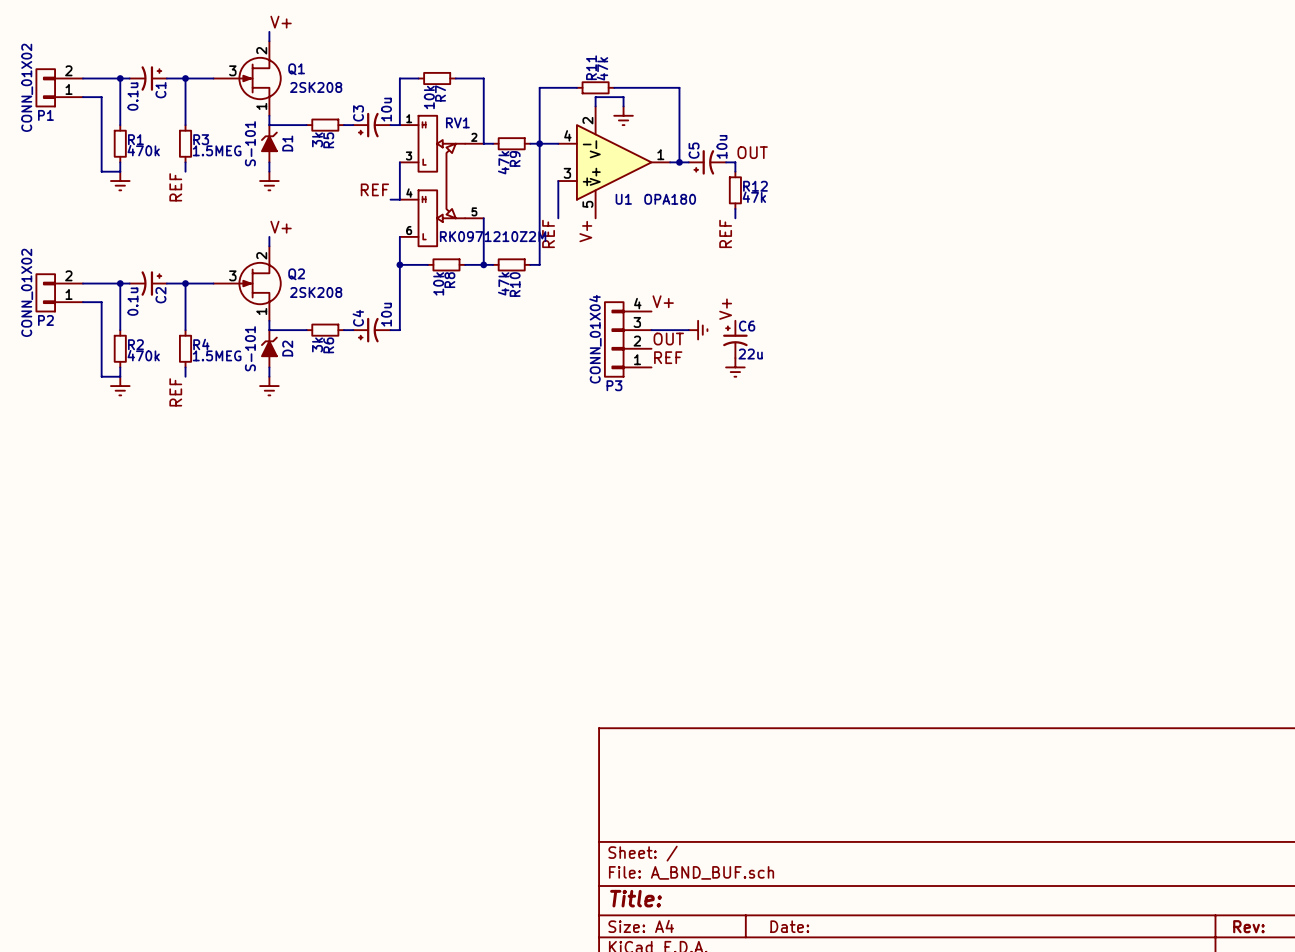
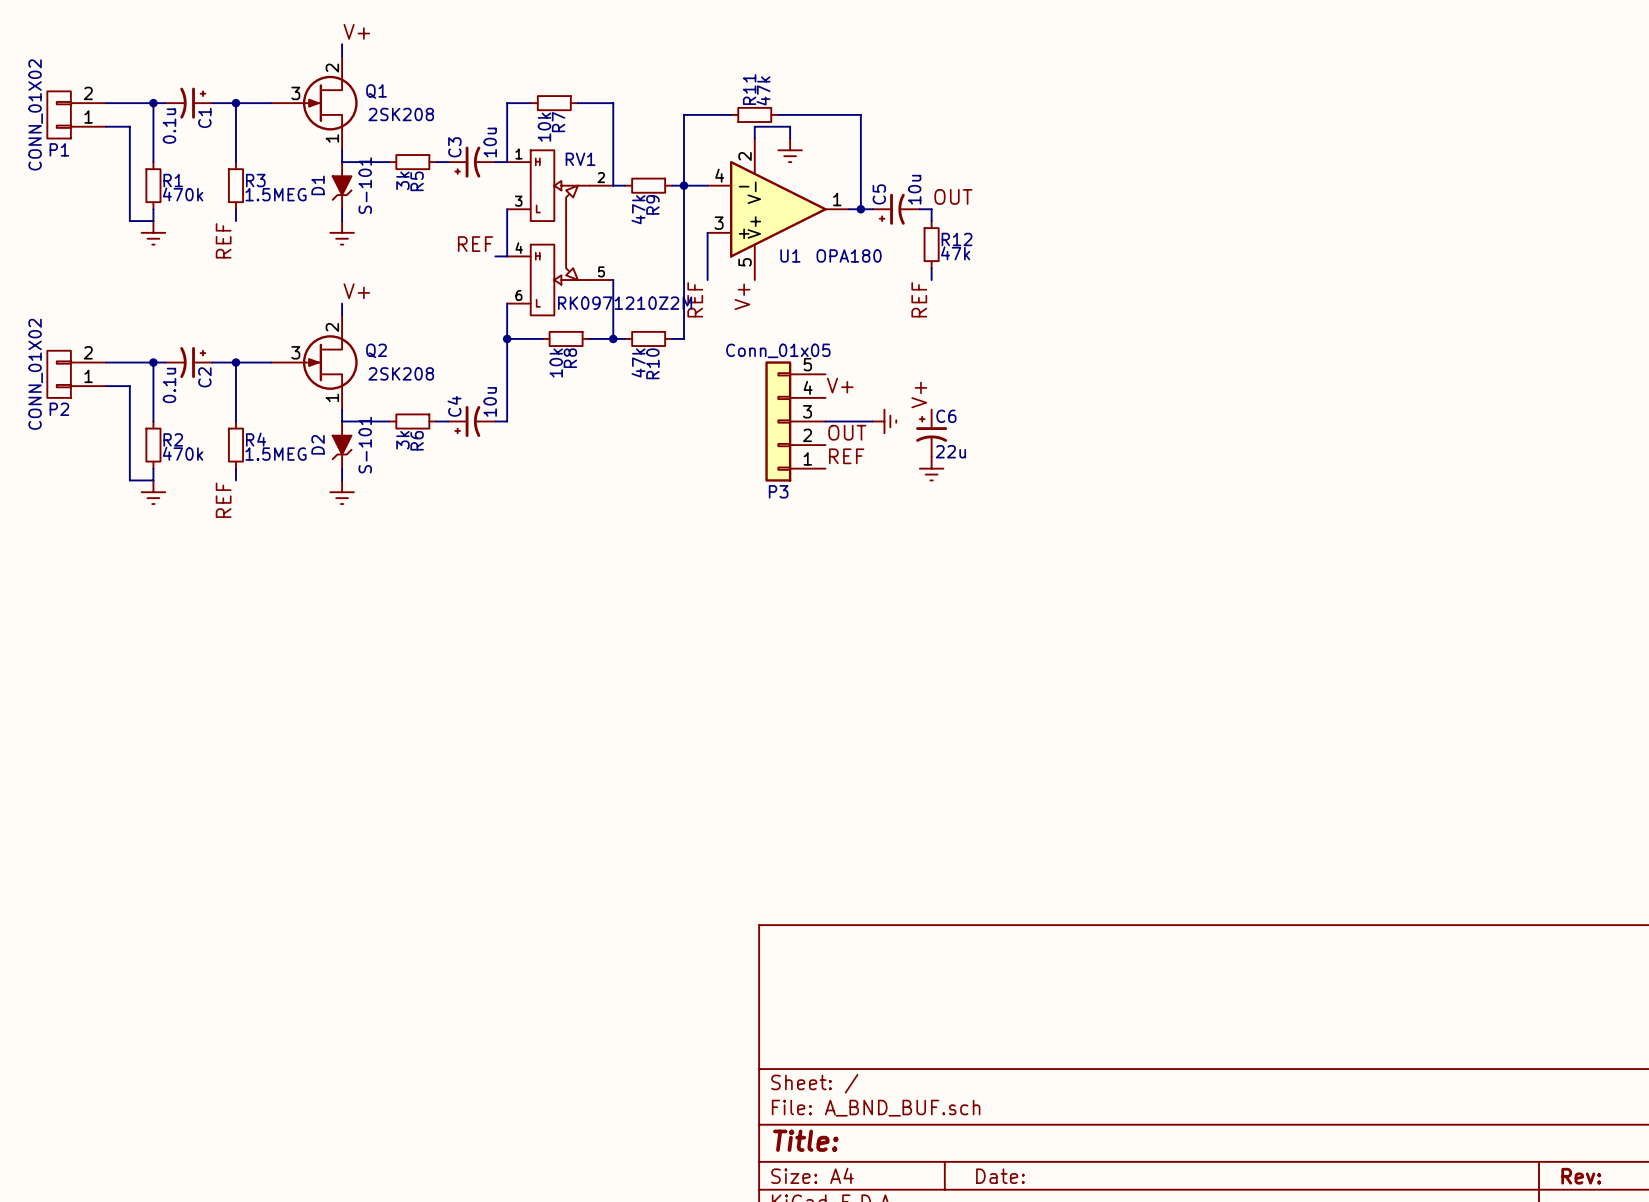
D1 rotation: 0° (269, 141) -> 180° (342, 188)
P3 symbol: [604, 302, 652, 377] -> [765, 361, 826, 482]
P3 value: CONN_01X04 (595, 339) -> Conn_01x05 (778, 350)
D2 rotation: 0° (269, 346) -> 180° (342, 447)

